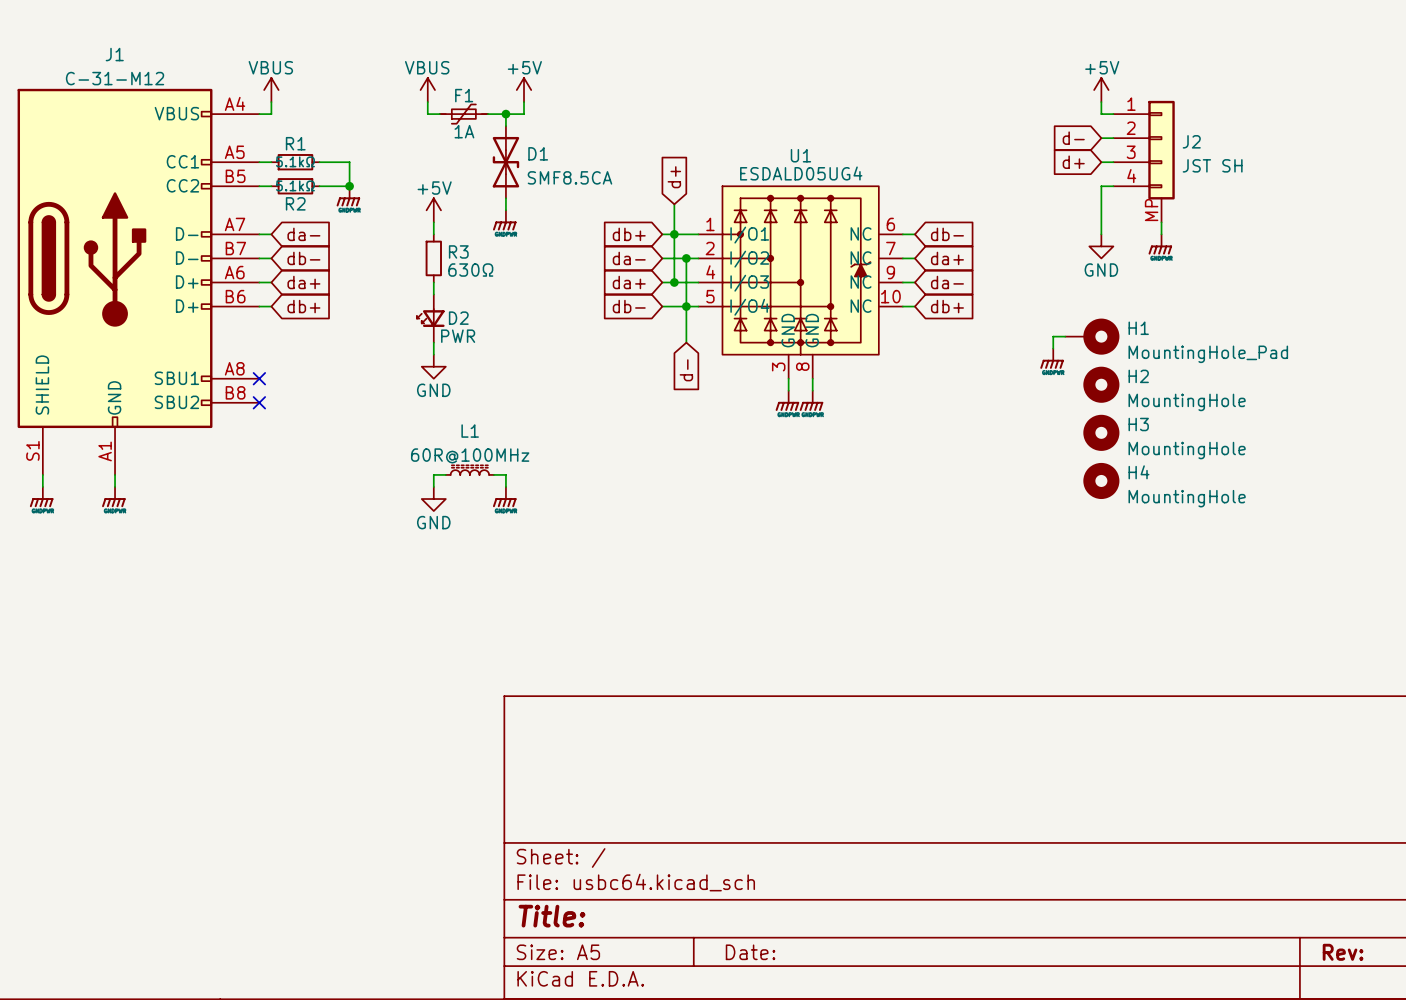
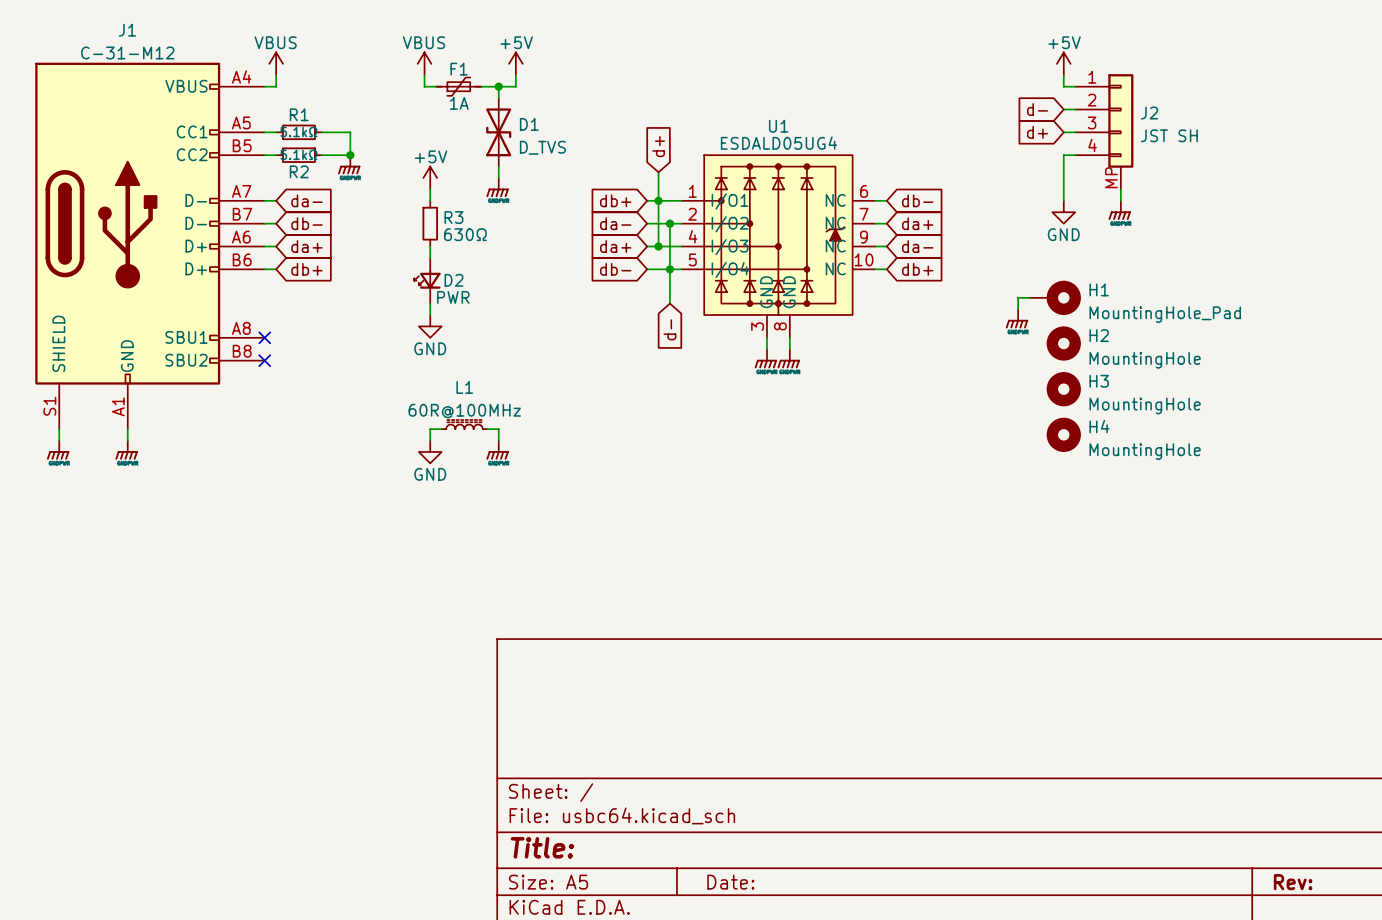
D1 value: SMF8.5CA (569, 177) -> D_TVS (542, 147)

